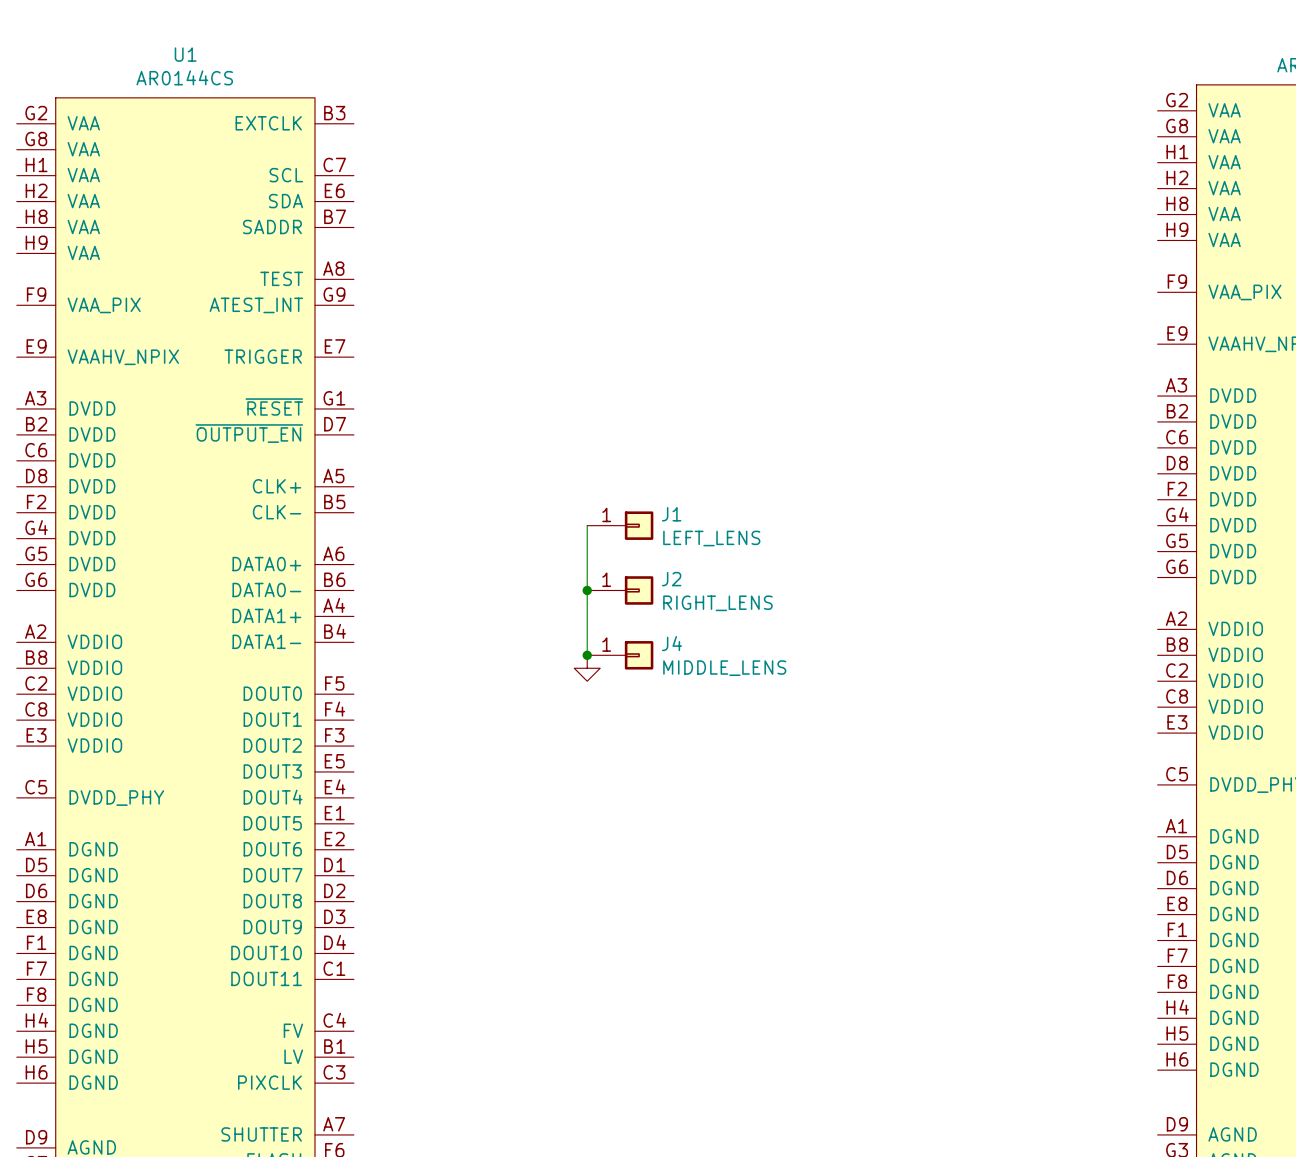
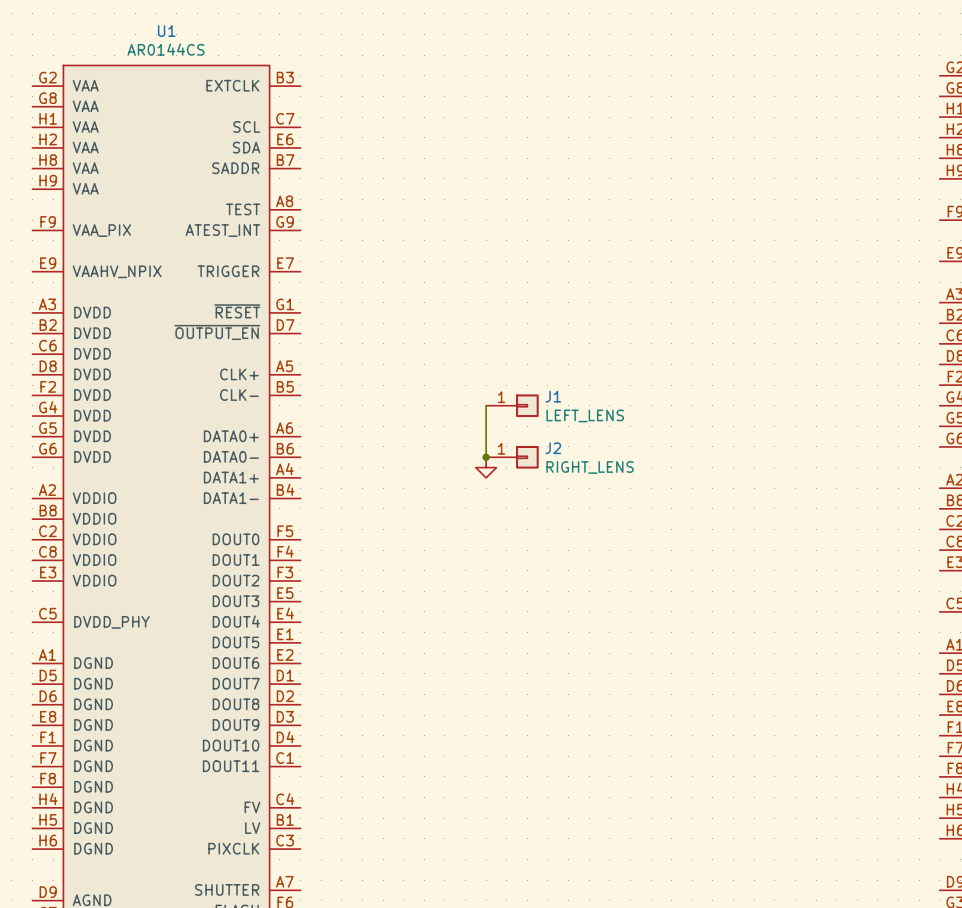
wire: (587, 590) (587, 655) -> none
junction: (587, 655) -> none
J4: MIDDLE_LENS (620, 655) -> none
power symbol position: (587, 668) -> (486, 467)

